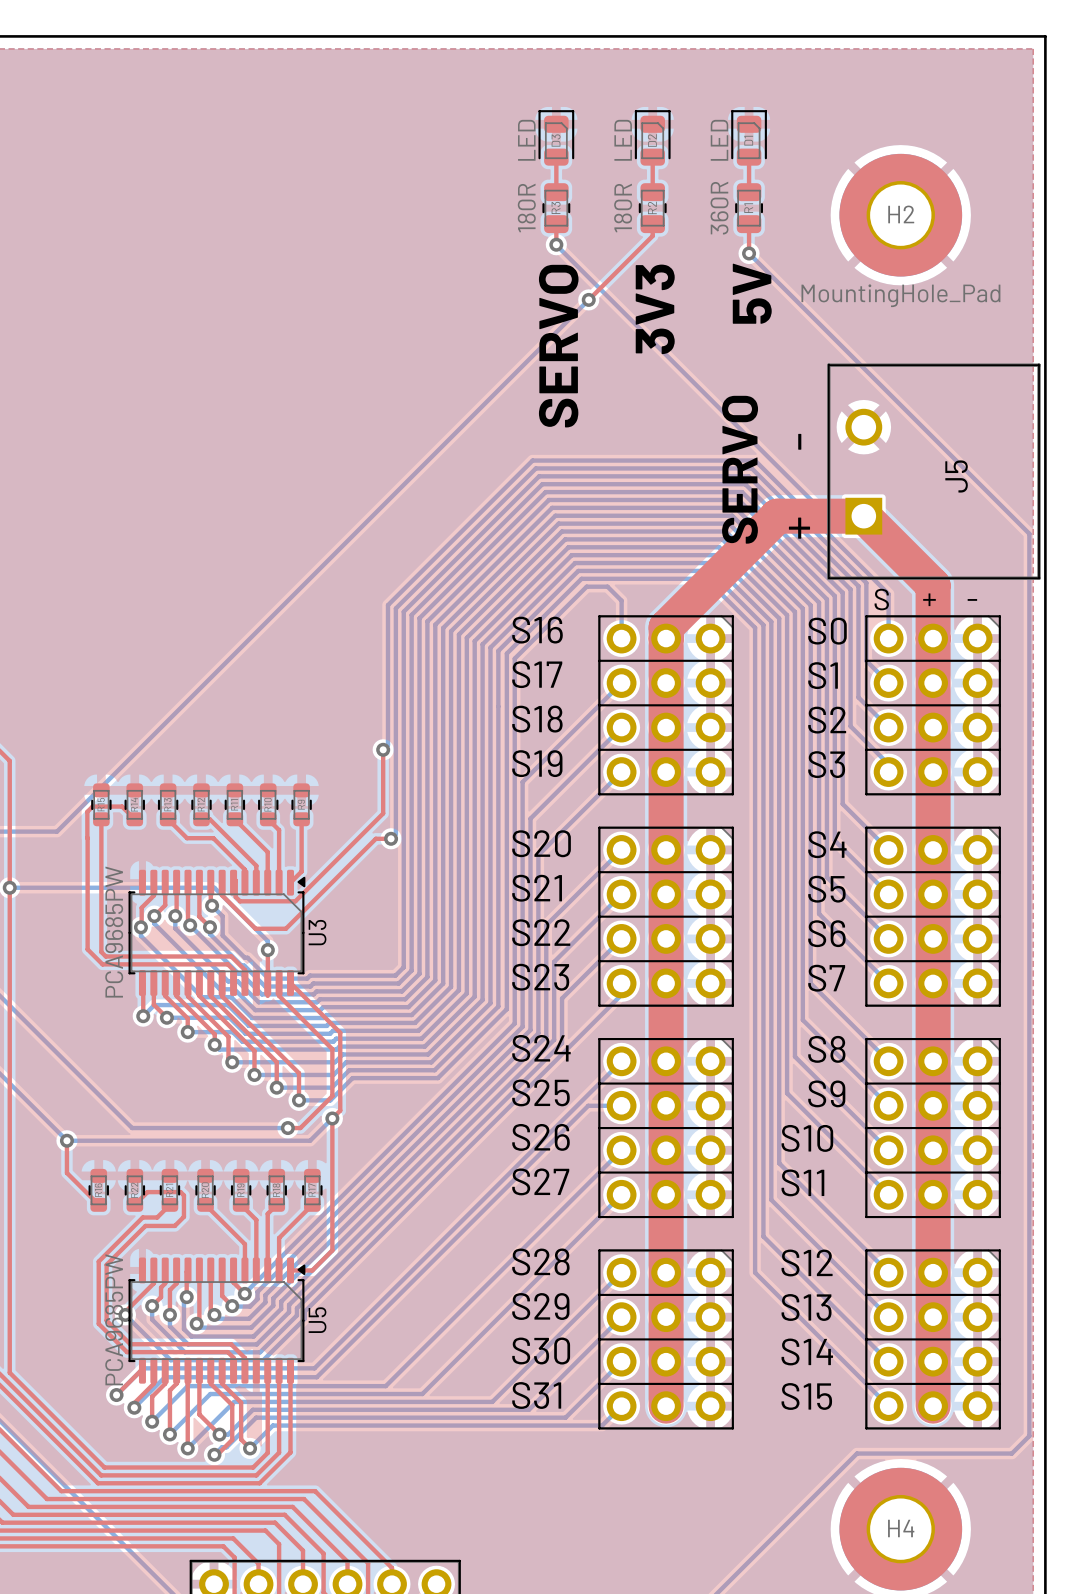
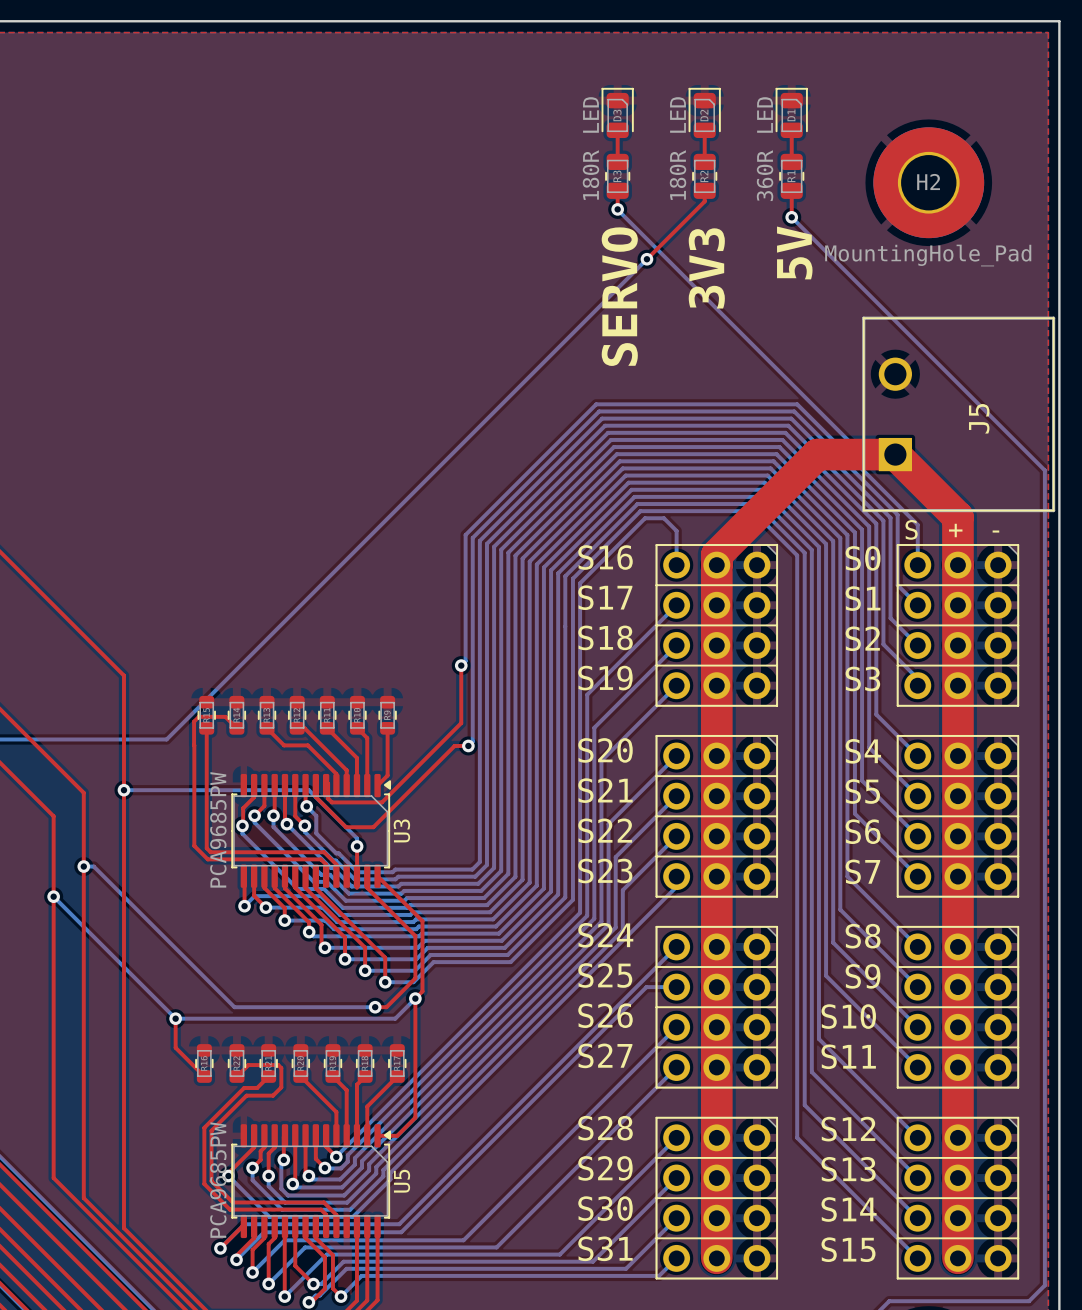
text: - (799, 441) -> none
text: SERVO (740, 469) -> none
text: + (799, 528) -> none

